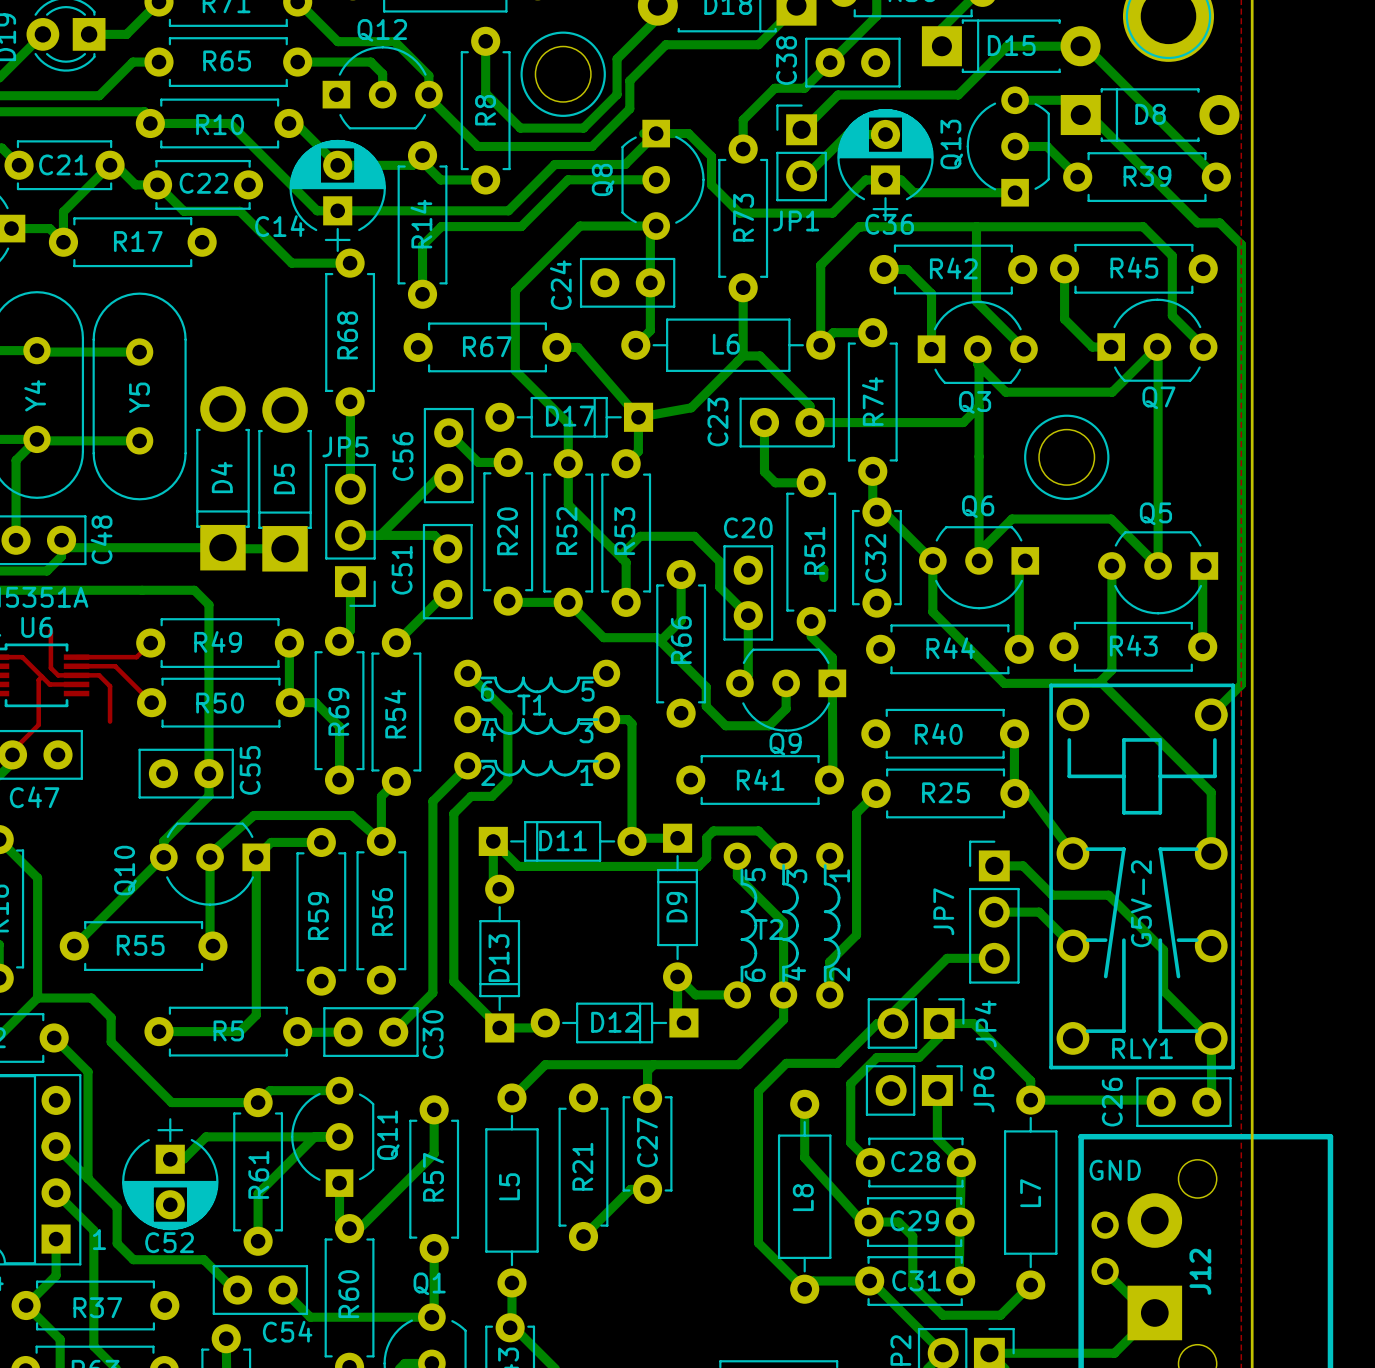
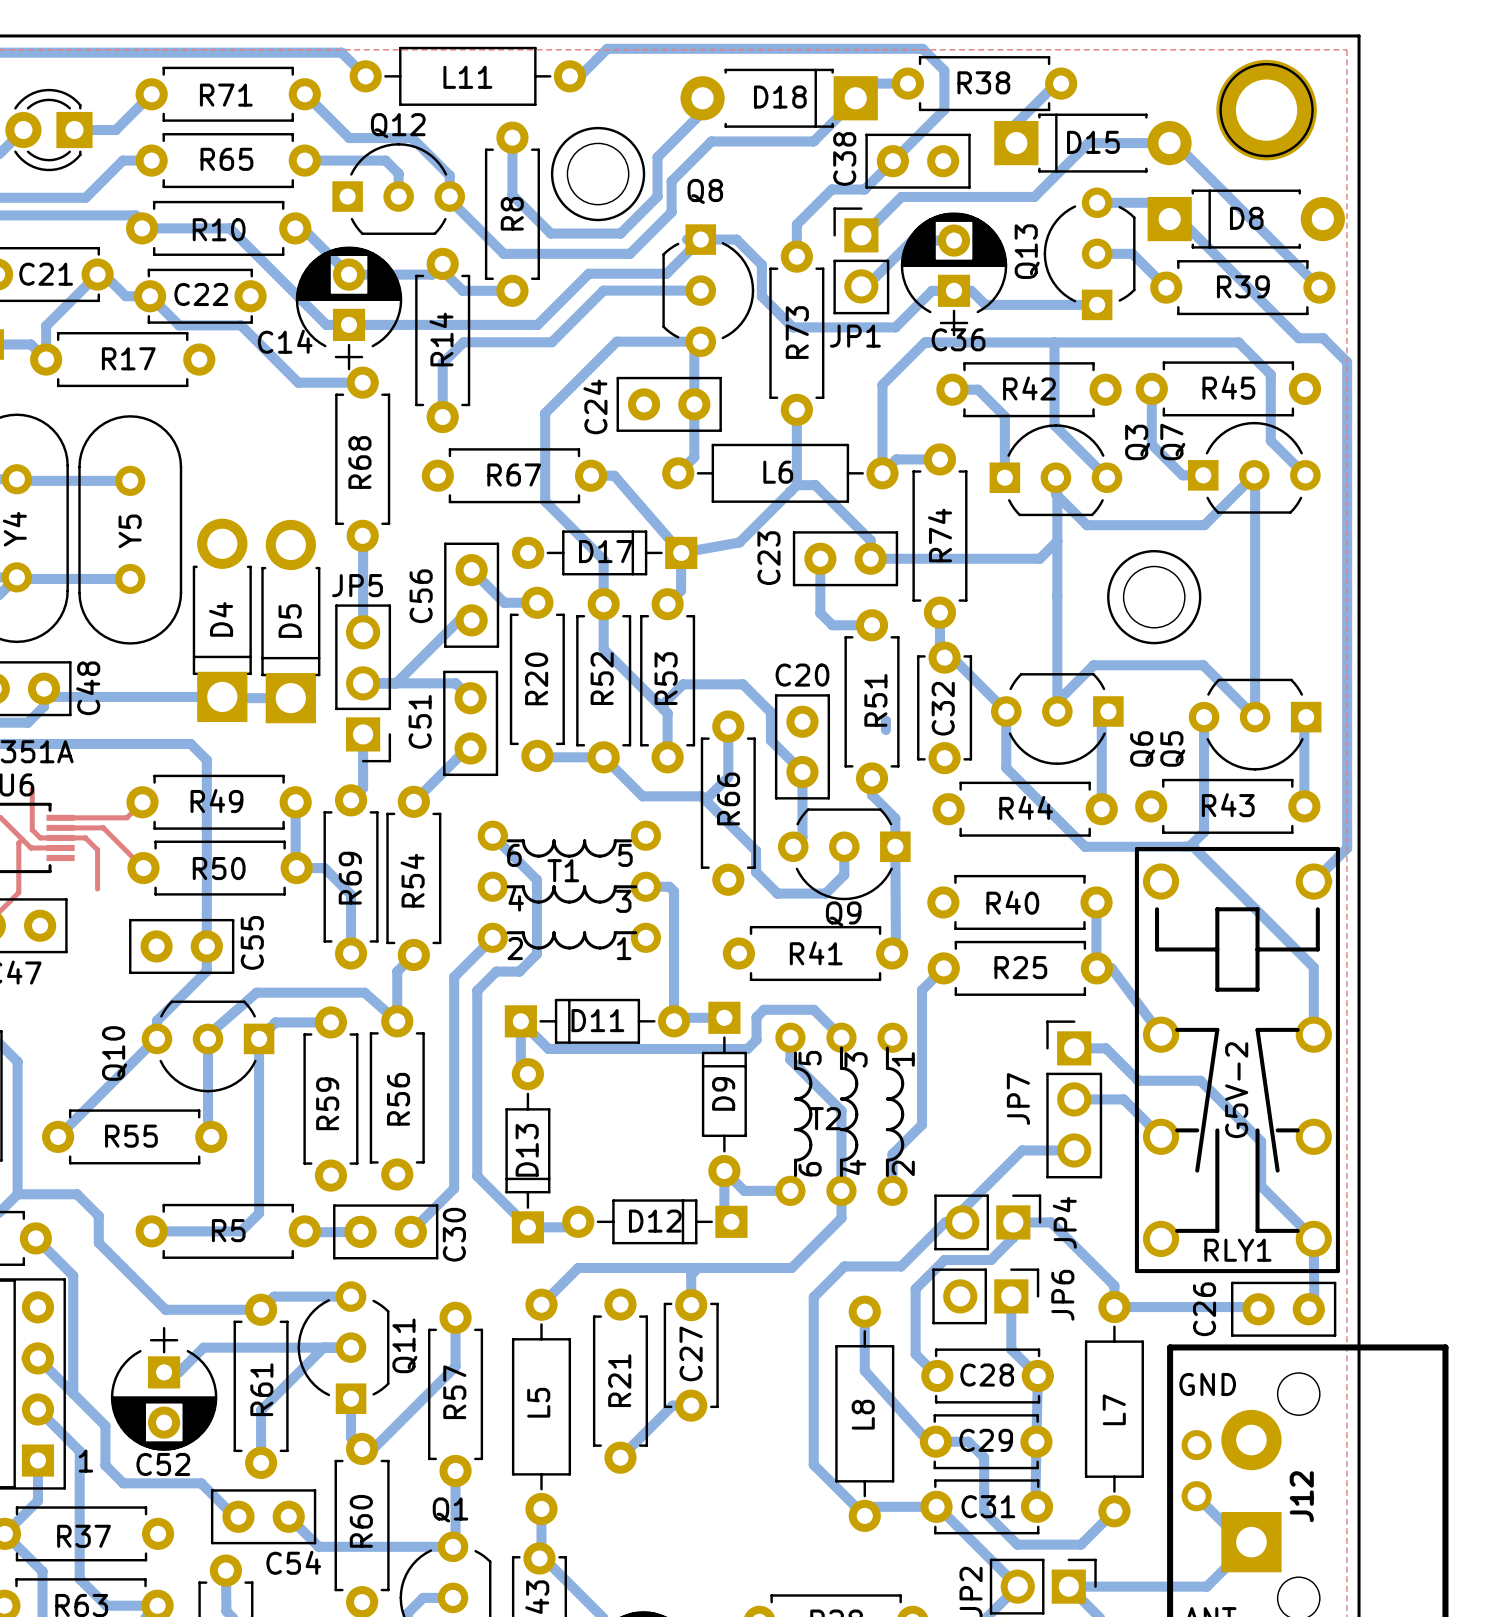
Q8 name rotation: 0° (603, 179) -> 90° clockwise (705, 191)
Q8 name position: Q8 (603, 179) -> Q8 (705, 191)
Q7 name rotation: 0° (1158, 397) -> 90° counterclockwise (1172, 441)
Q7 name position: Q7 (1158, 397) -> Q7 (1172, 441)
Q3 name rotation: 0° (975, 402) -> 90° counterclockwise (1137, 442)
Q3 name position: Q3 (975, 402) -> Q3 (1137, 442)
Q6 name rotation: 0° (978, 506) -> 90° counterclockwise (1142, 748)
Q6 name position: Q6 (978, 506) -> Q6 (1142, 748)
Q5 name rotation: 0° (1155, 513) -> 90° counterclockwise (1172, 748)
Q5 name position: Q5 (1155, 513) -> Q5 (1172, 748)

